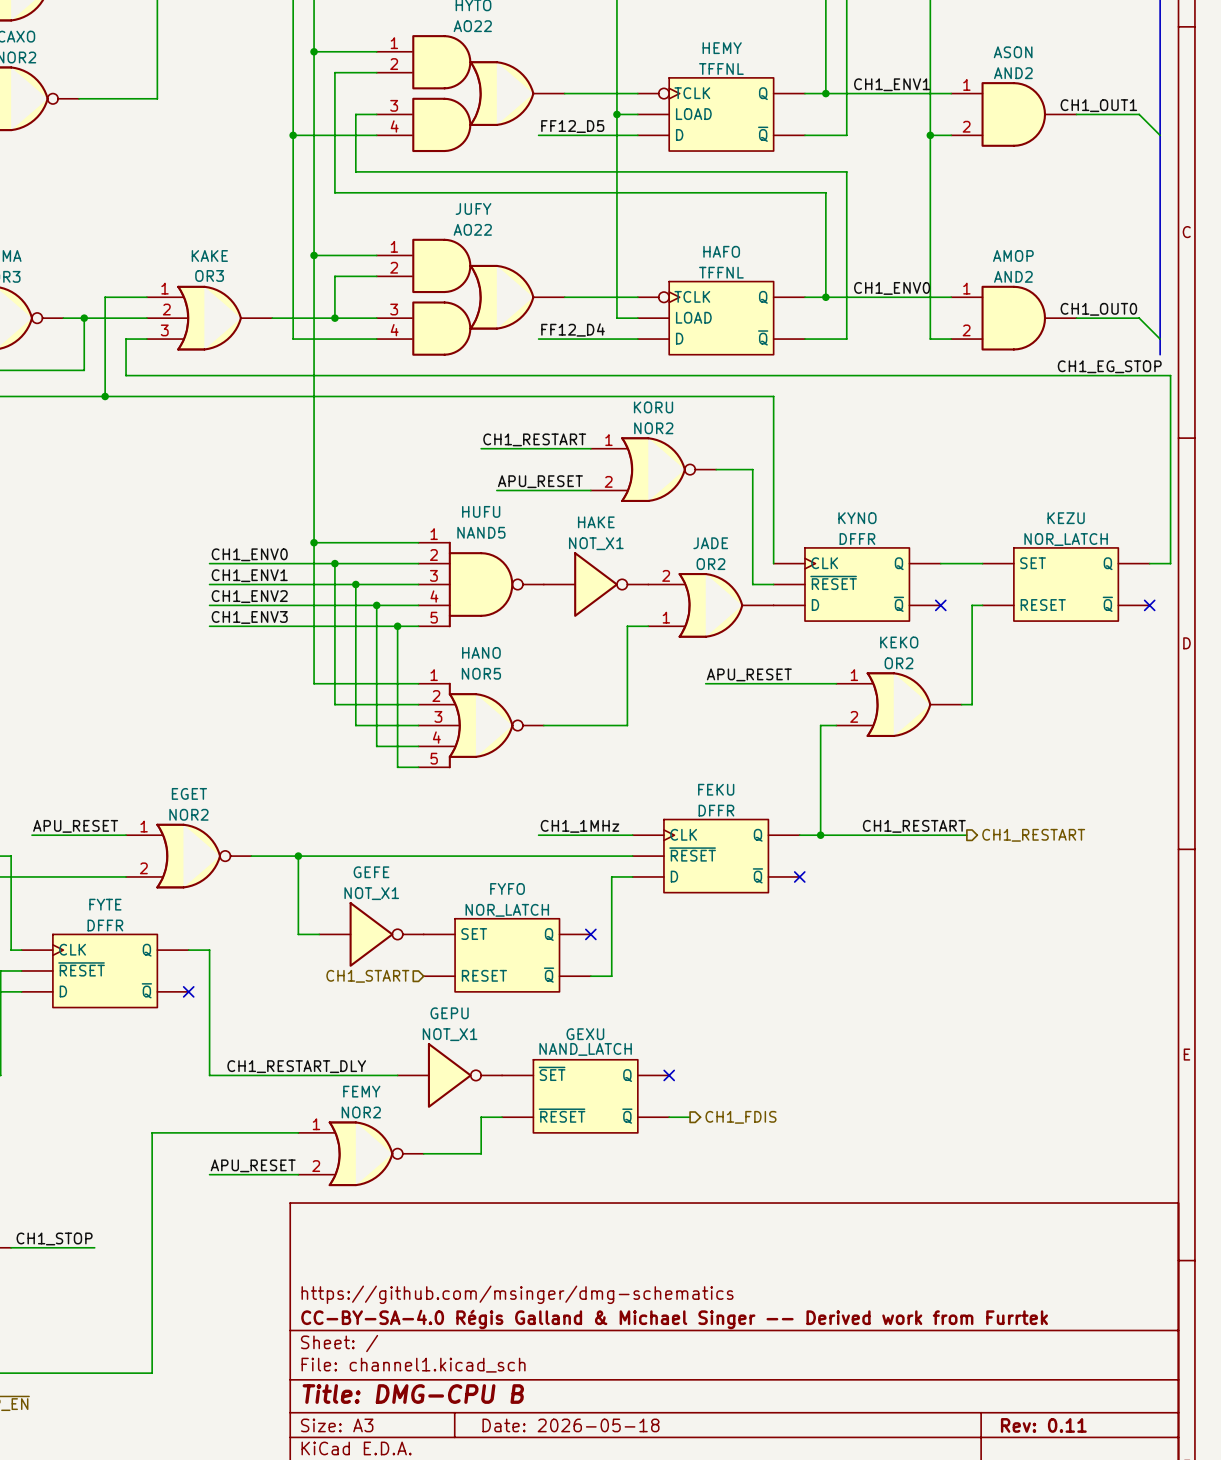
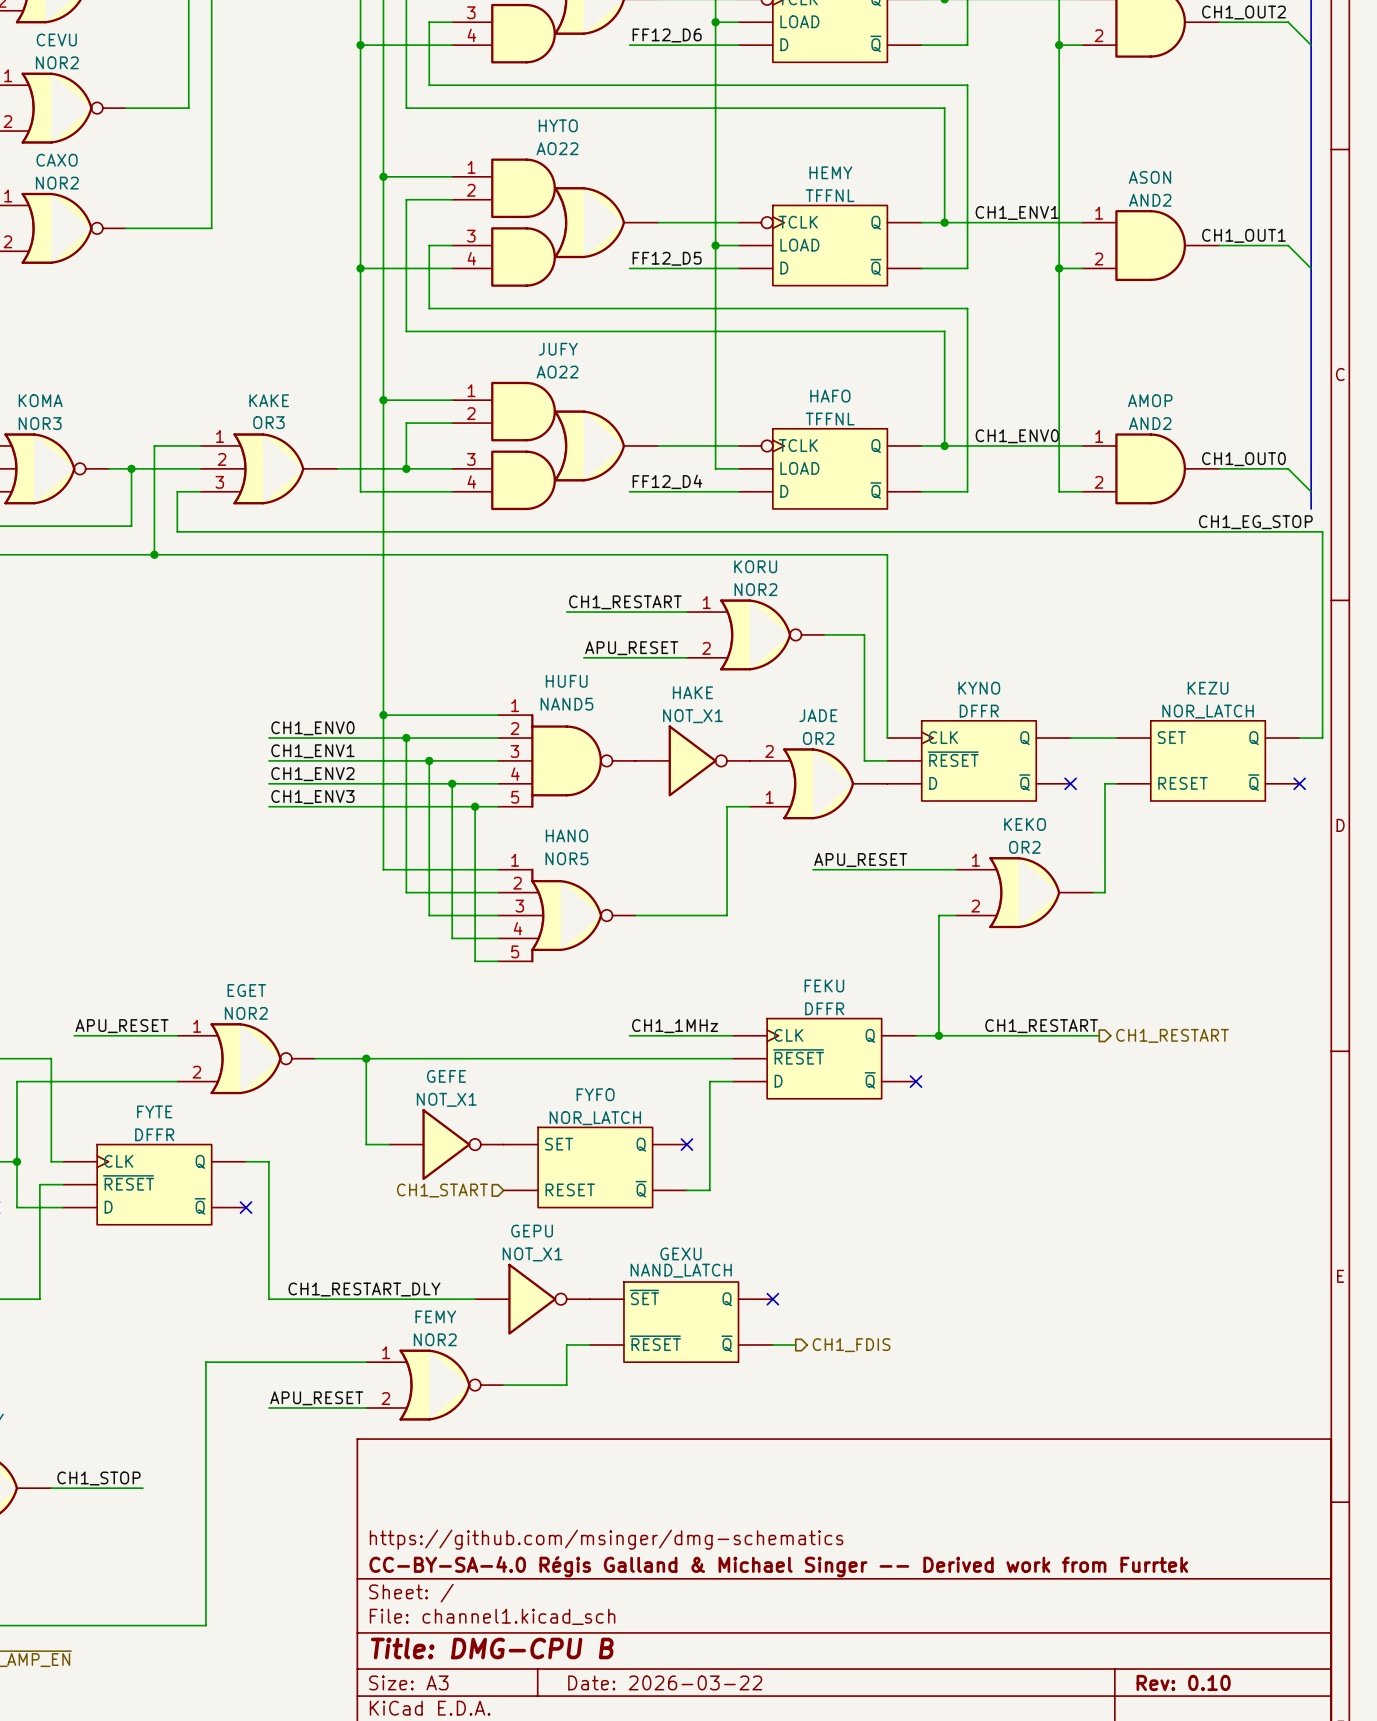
title block: Date: 2026-05-18 (570, 1425) -> Date: 2026-03-22 (665, 1682)
title block: Rev: 0.11 (1043, 1425) -> Rev: 0.10 (1183, 1682)

